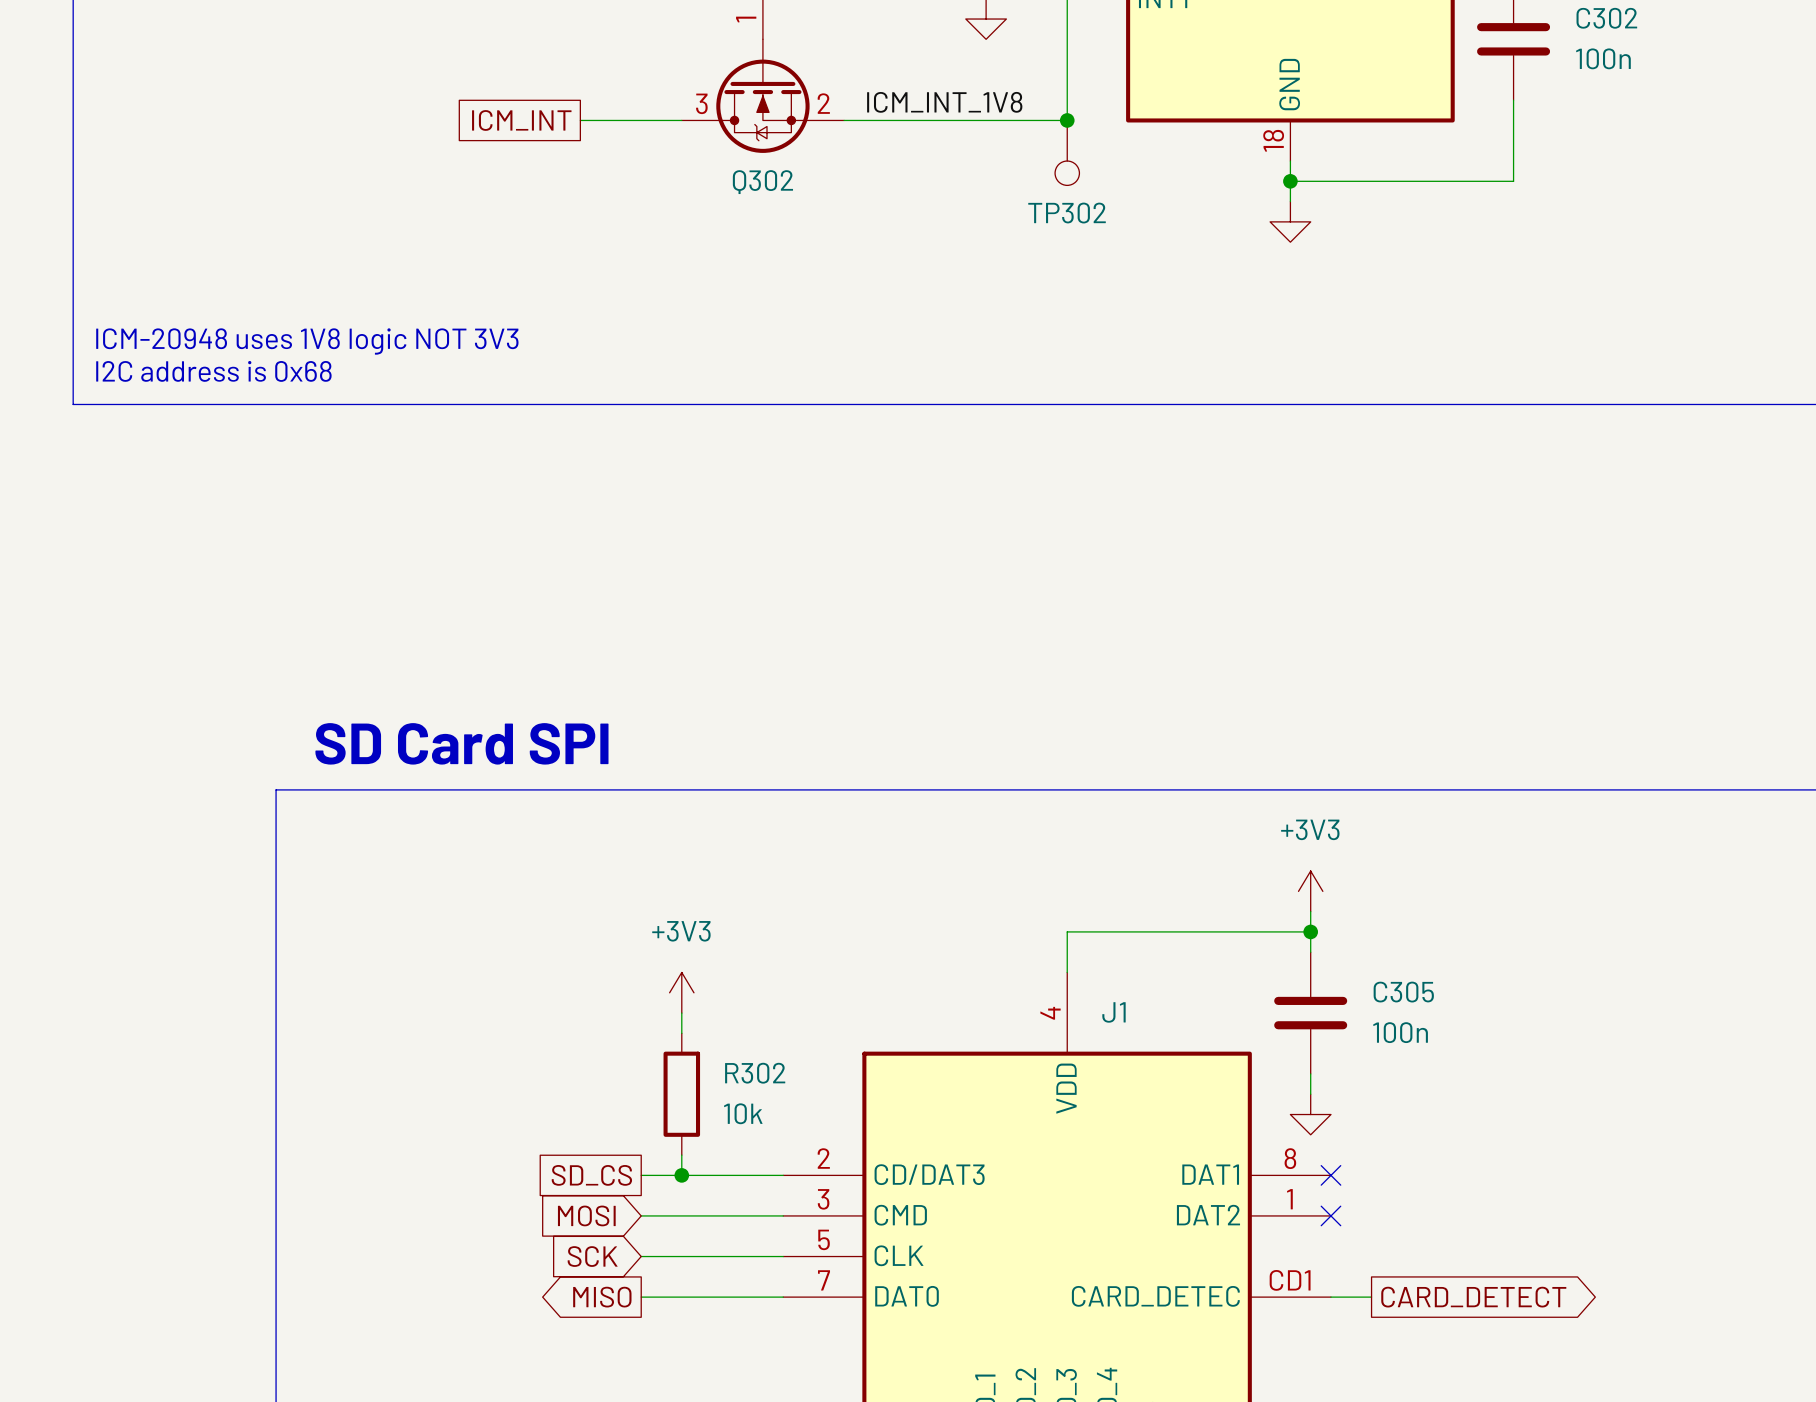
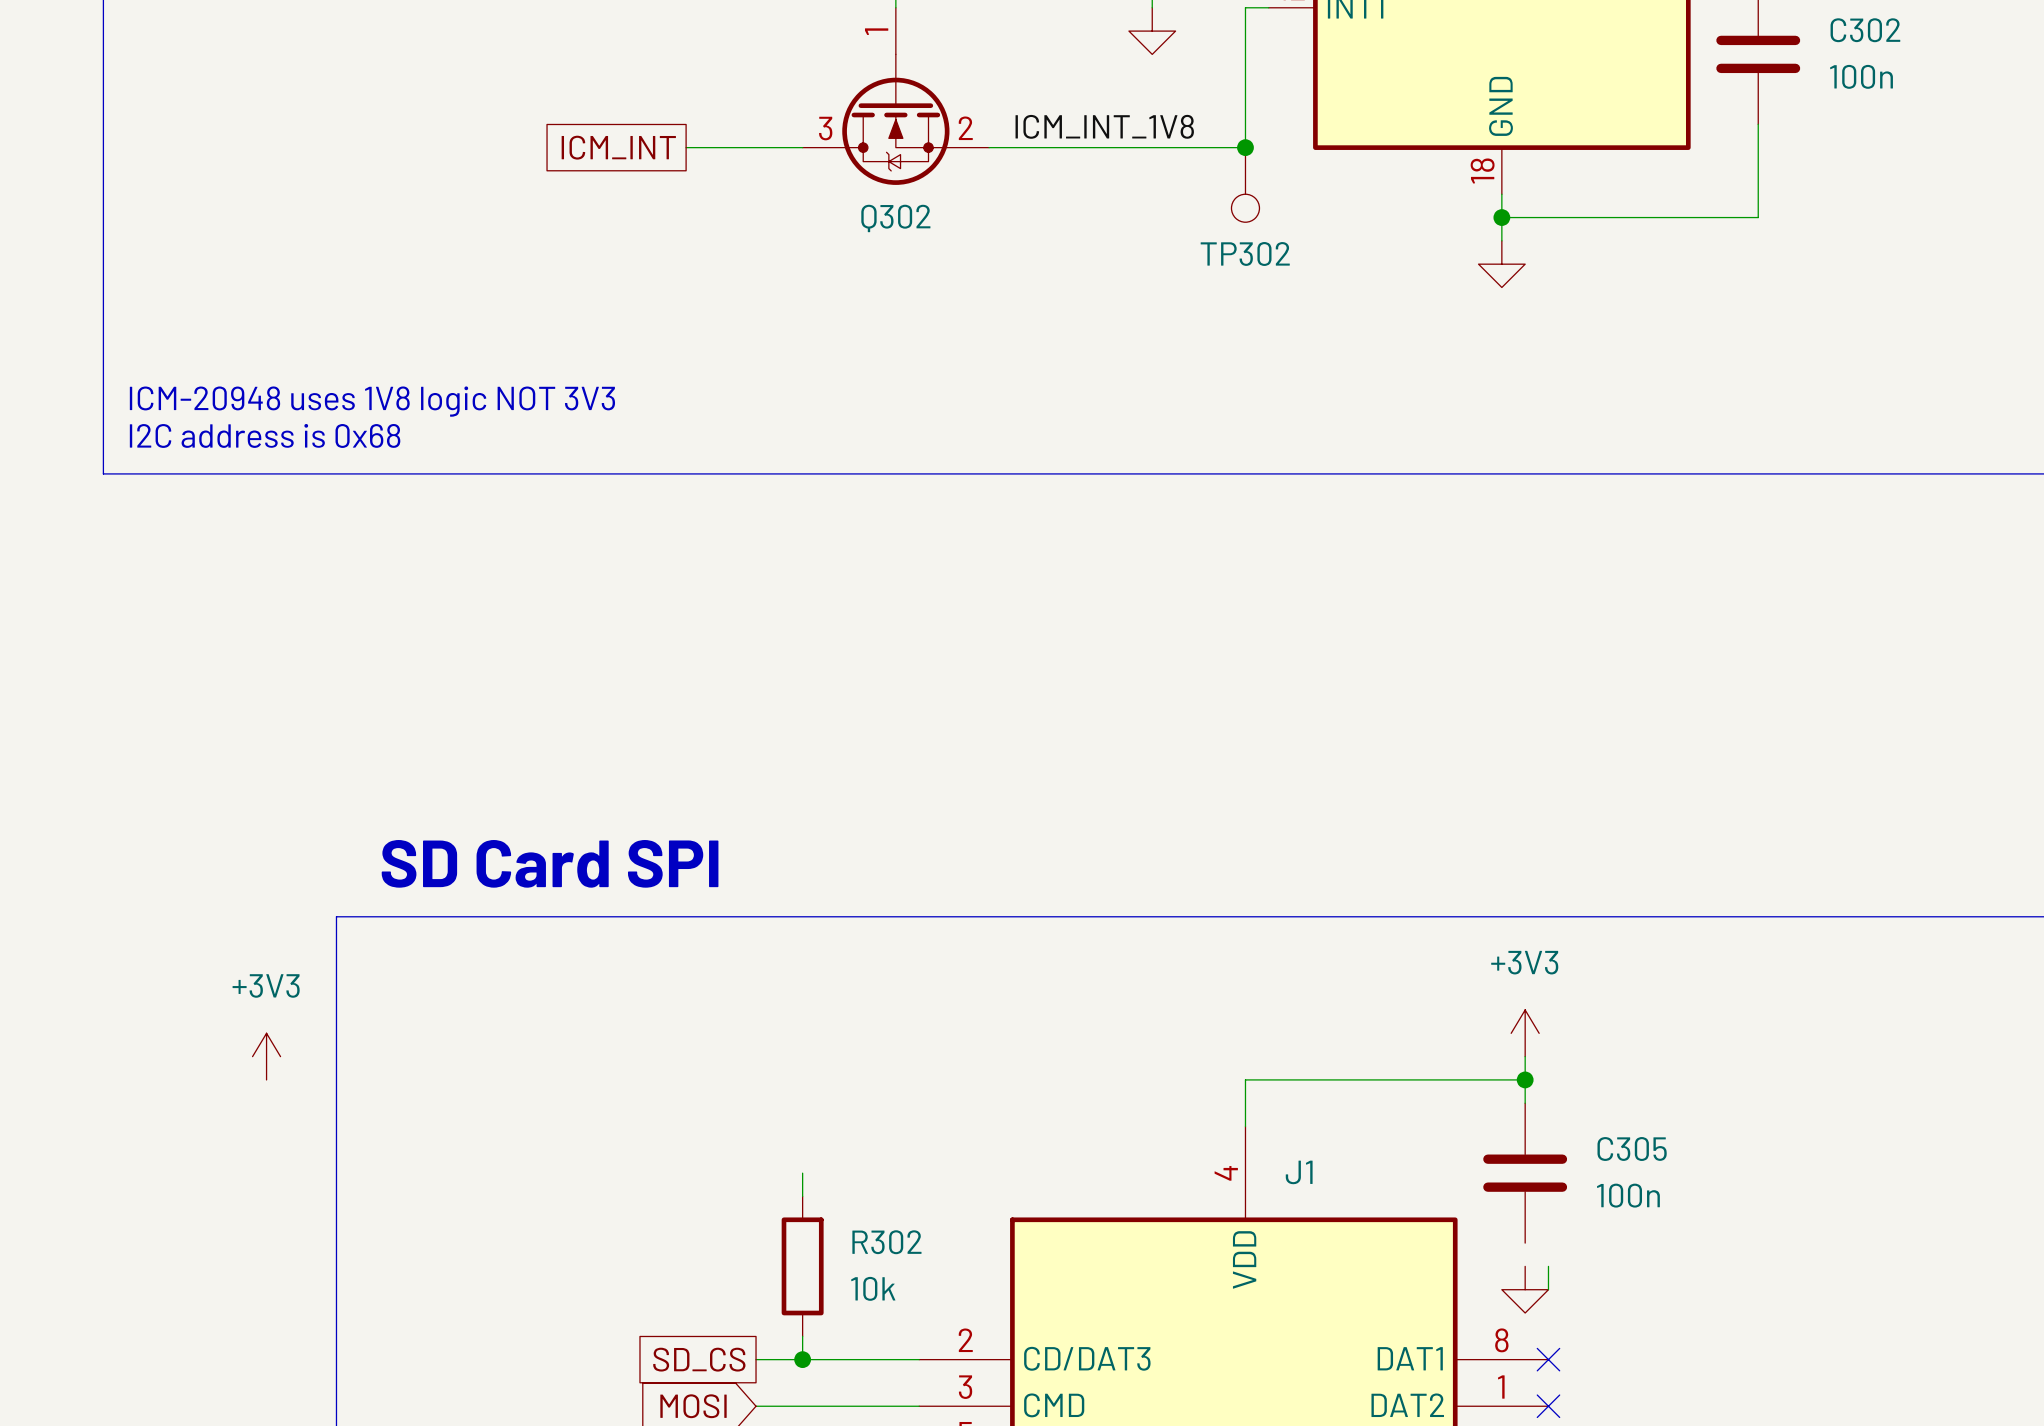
power symbol: none -> +3V3 (266, 1056)
power symbol: +3V3 (681, 992) -> none
wire: (1310, 1073) (1310, 1094) -> (1548, 1266) (1548, 1289)

